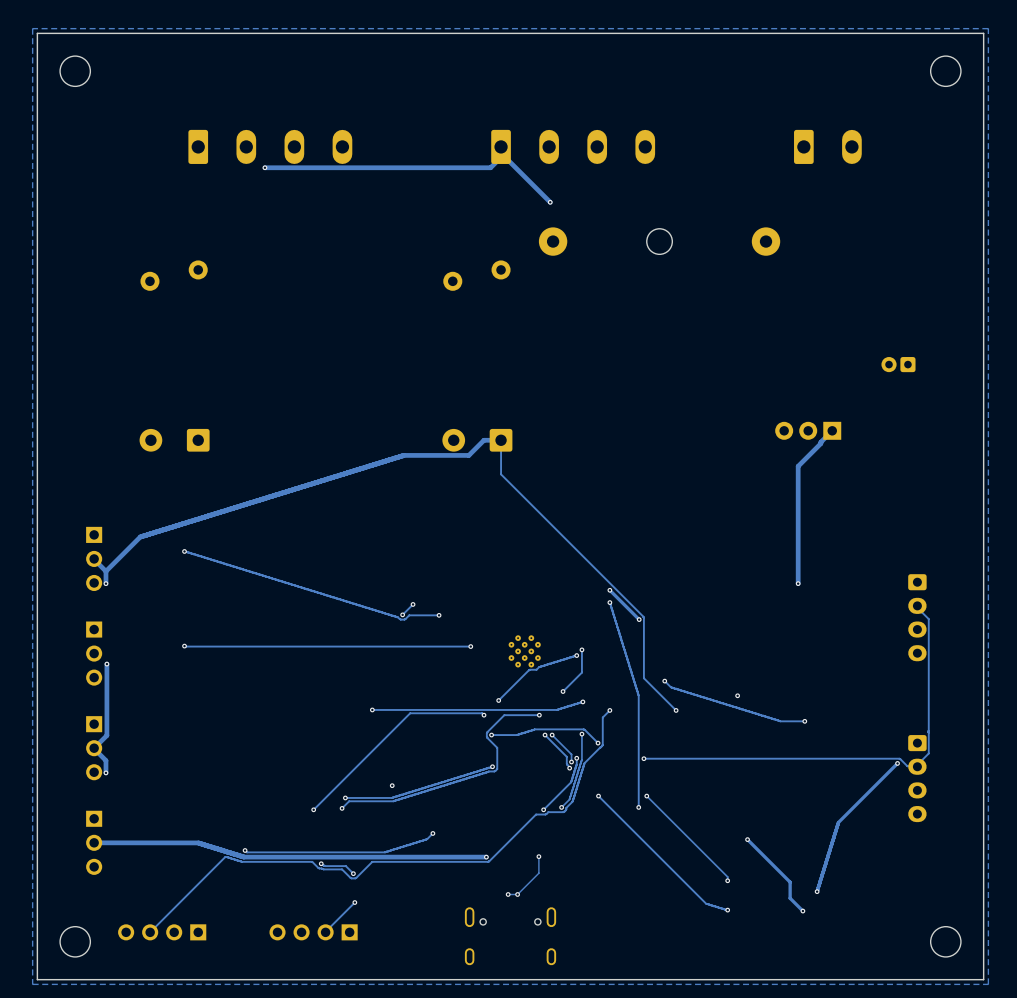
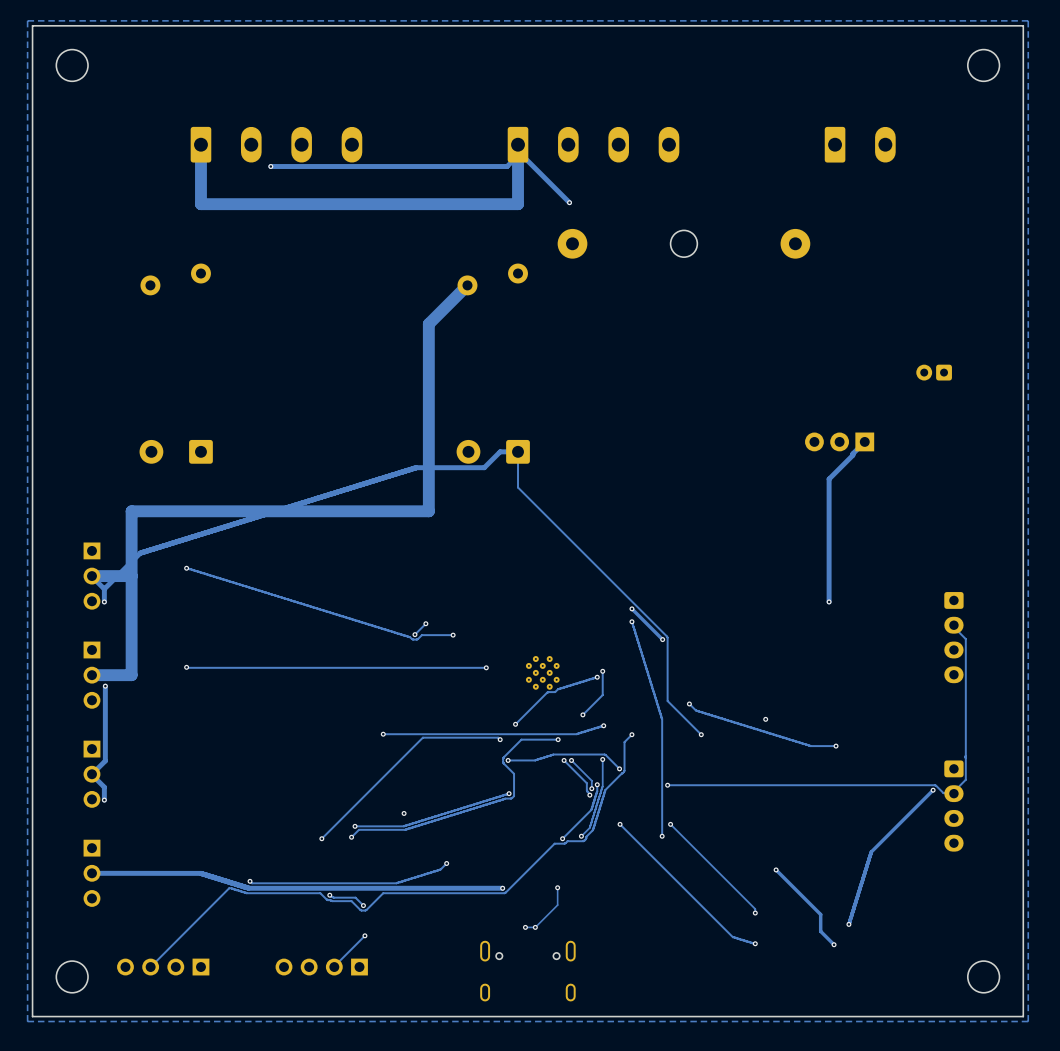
track: none -> (518, 144) (518, 204) (200, 204) (200, 144)
track: none -> (467, 285) (428, 324) (428, 511) (131, 511) (131, 675) (91, 675)
track: none -> (131, 576) (91, 576)

